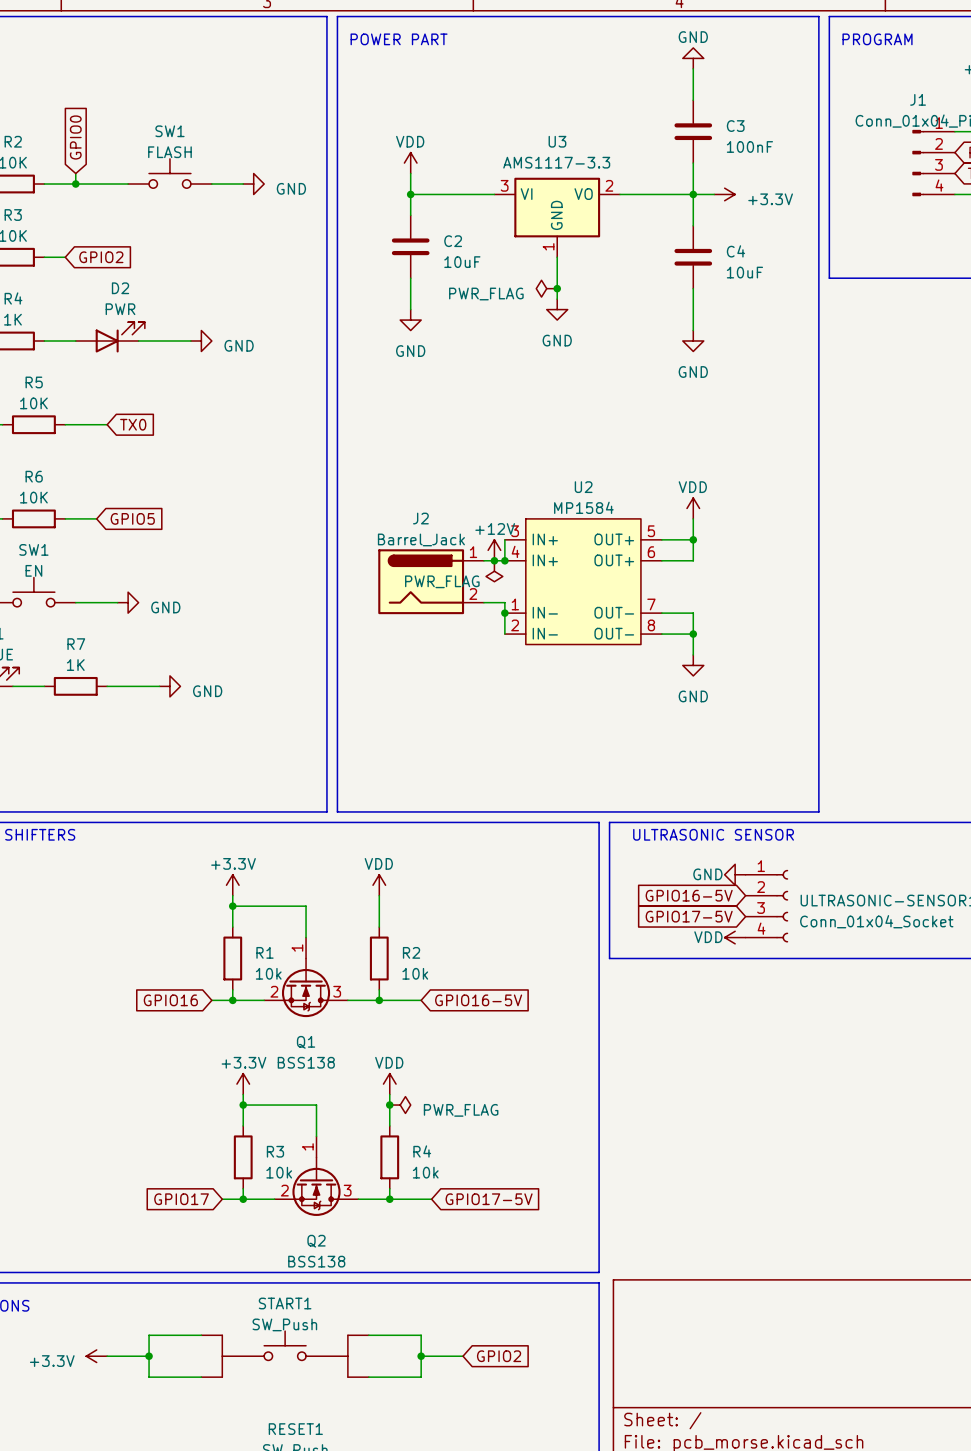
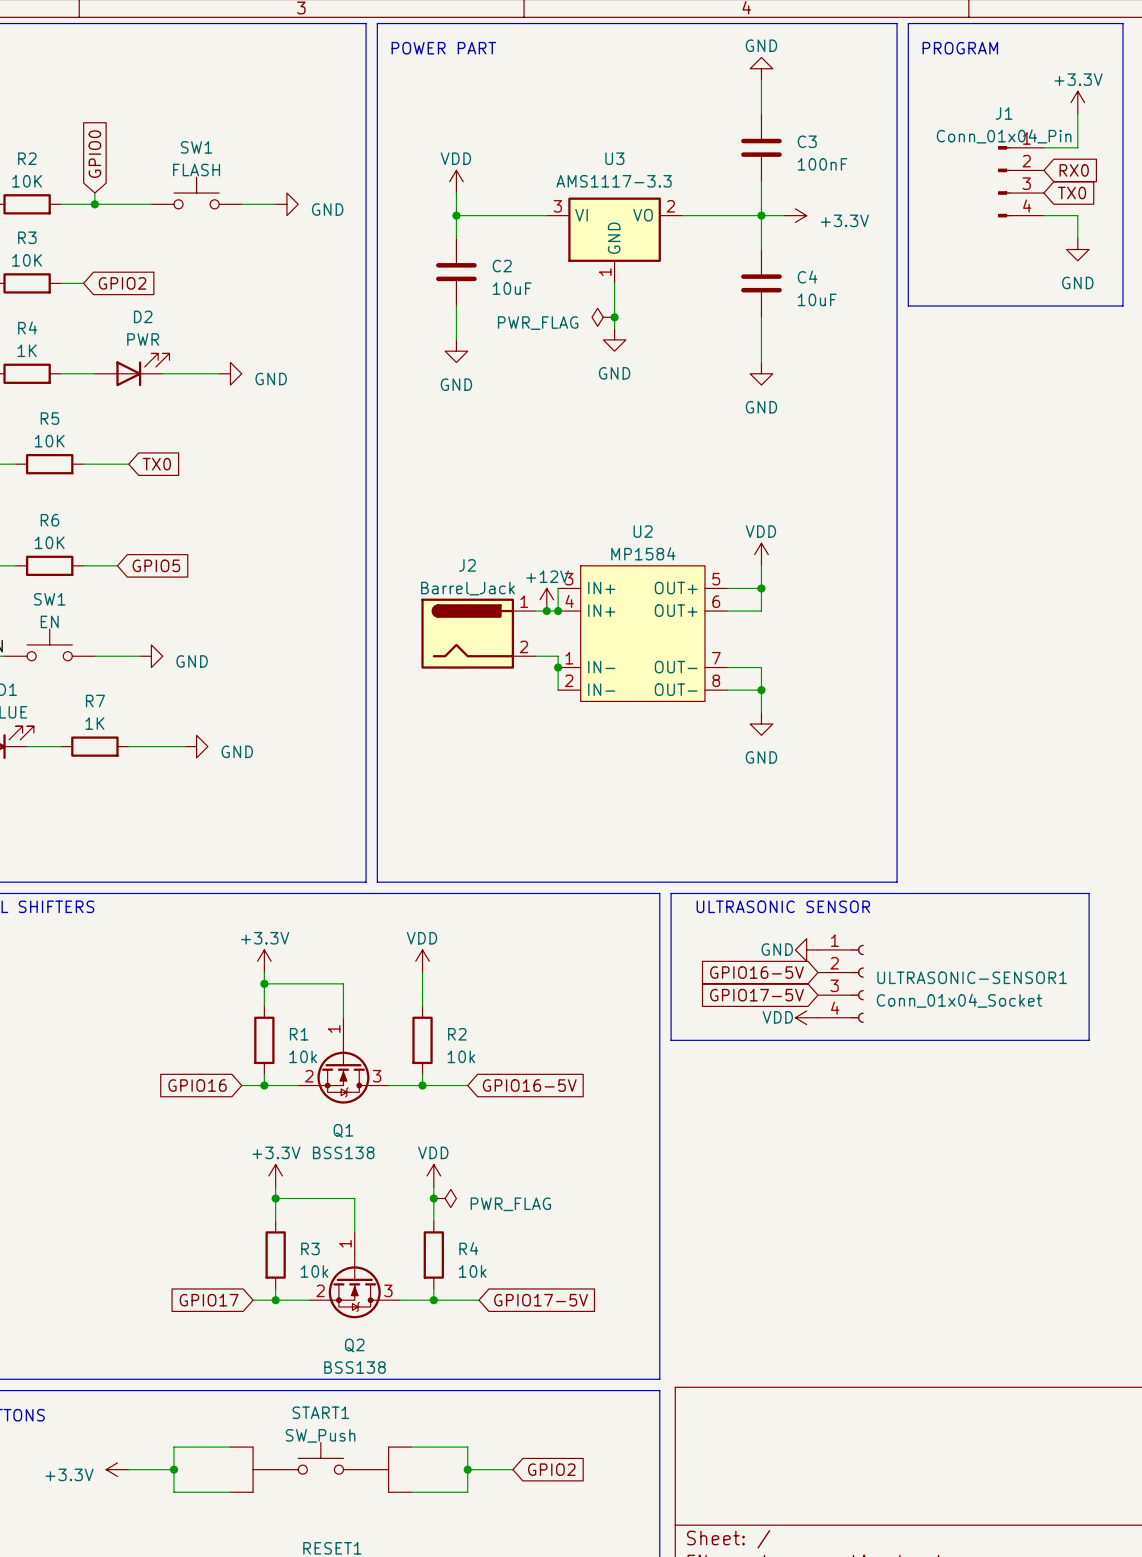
power symbol: PWR_FLAG (494, 571) -> none

